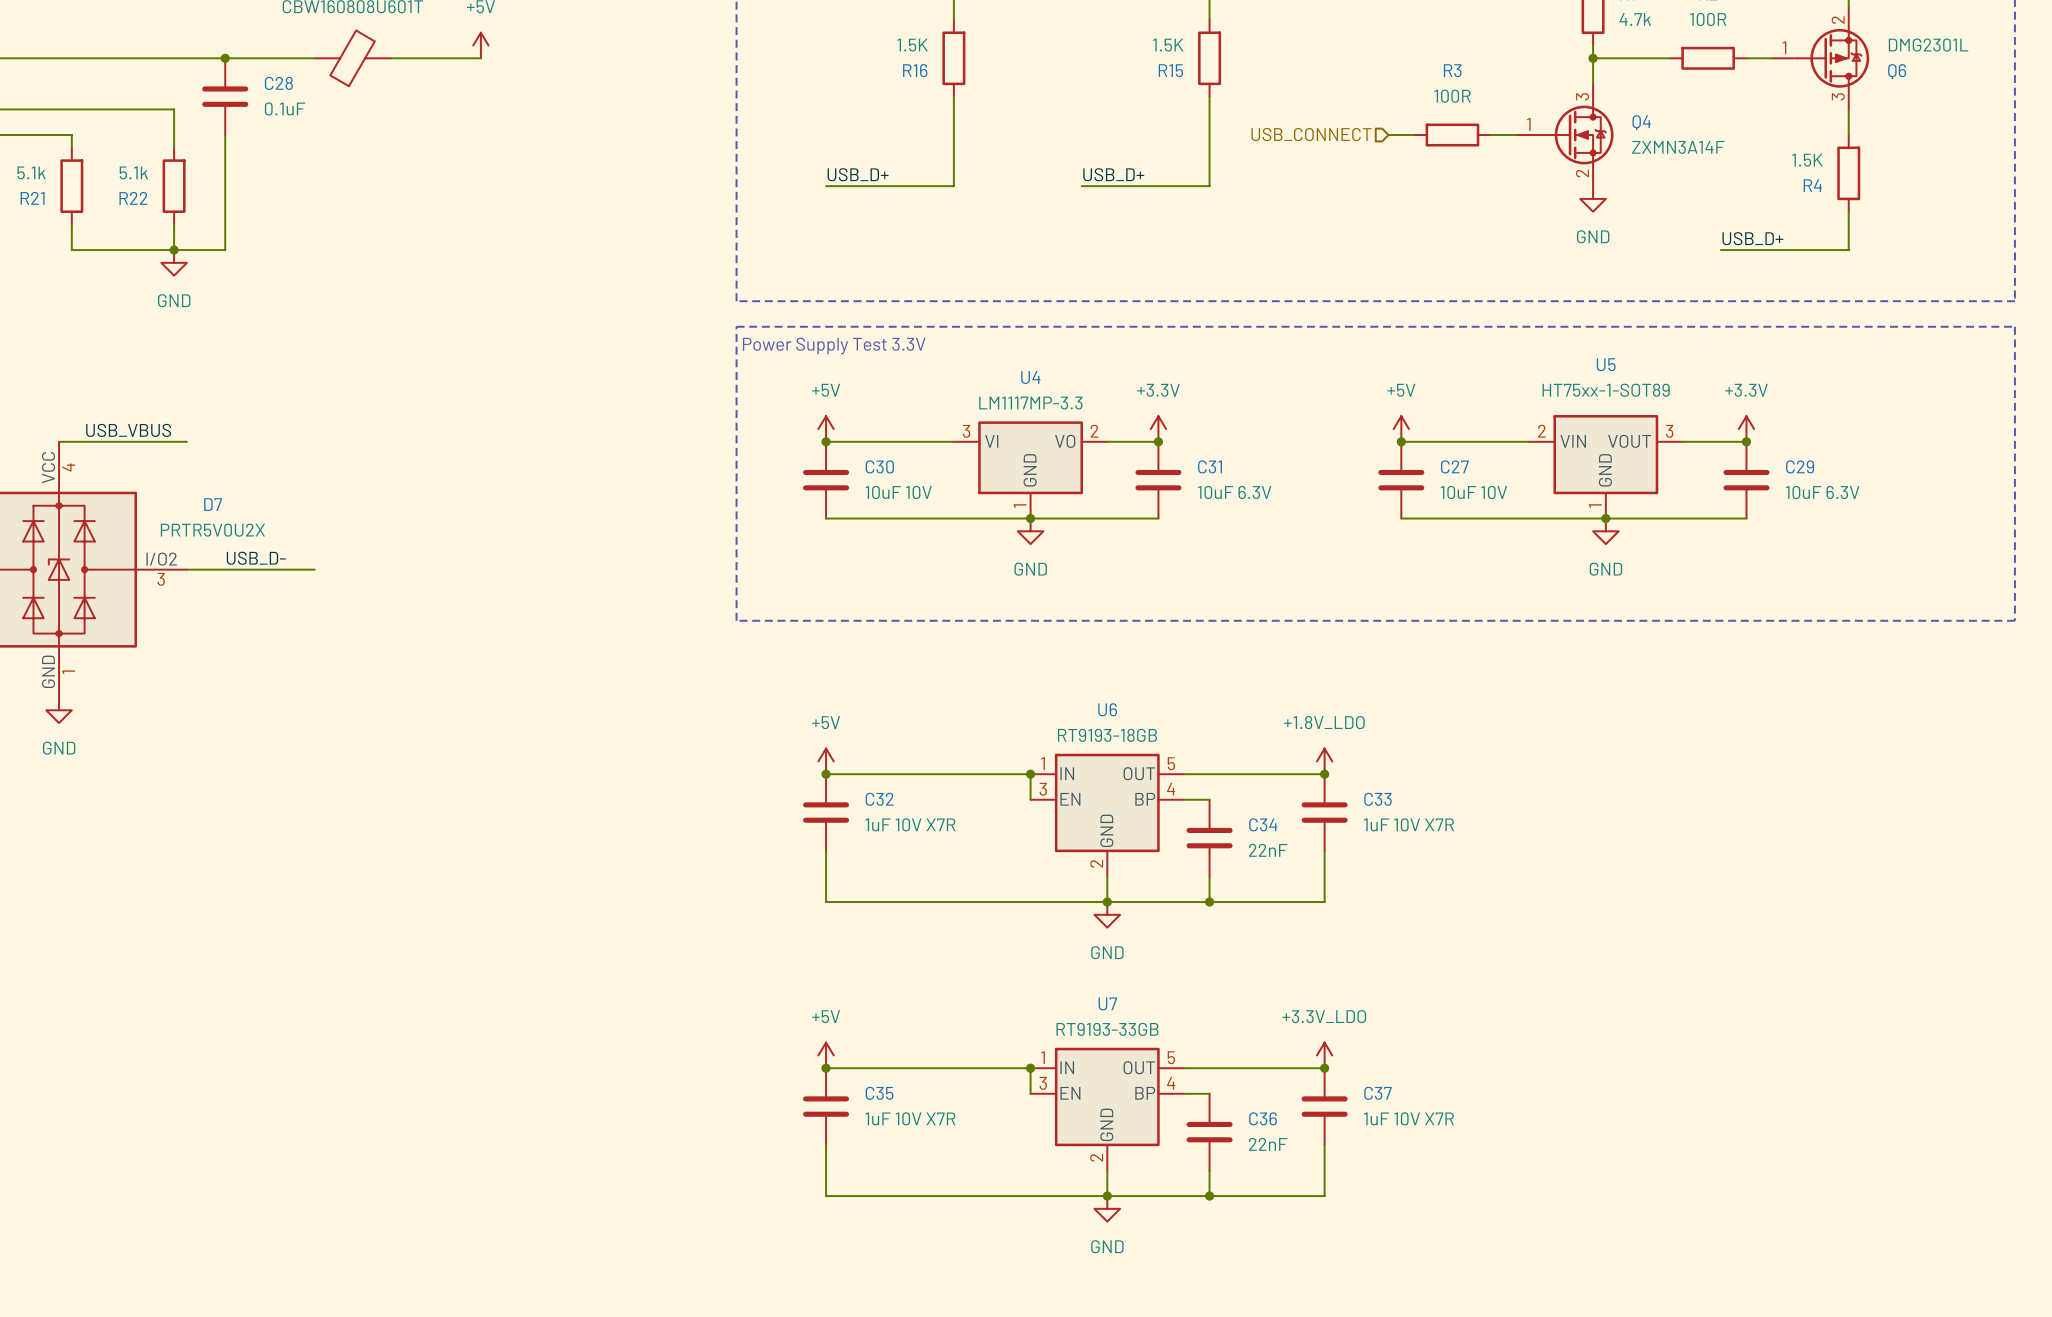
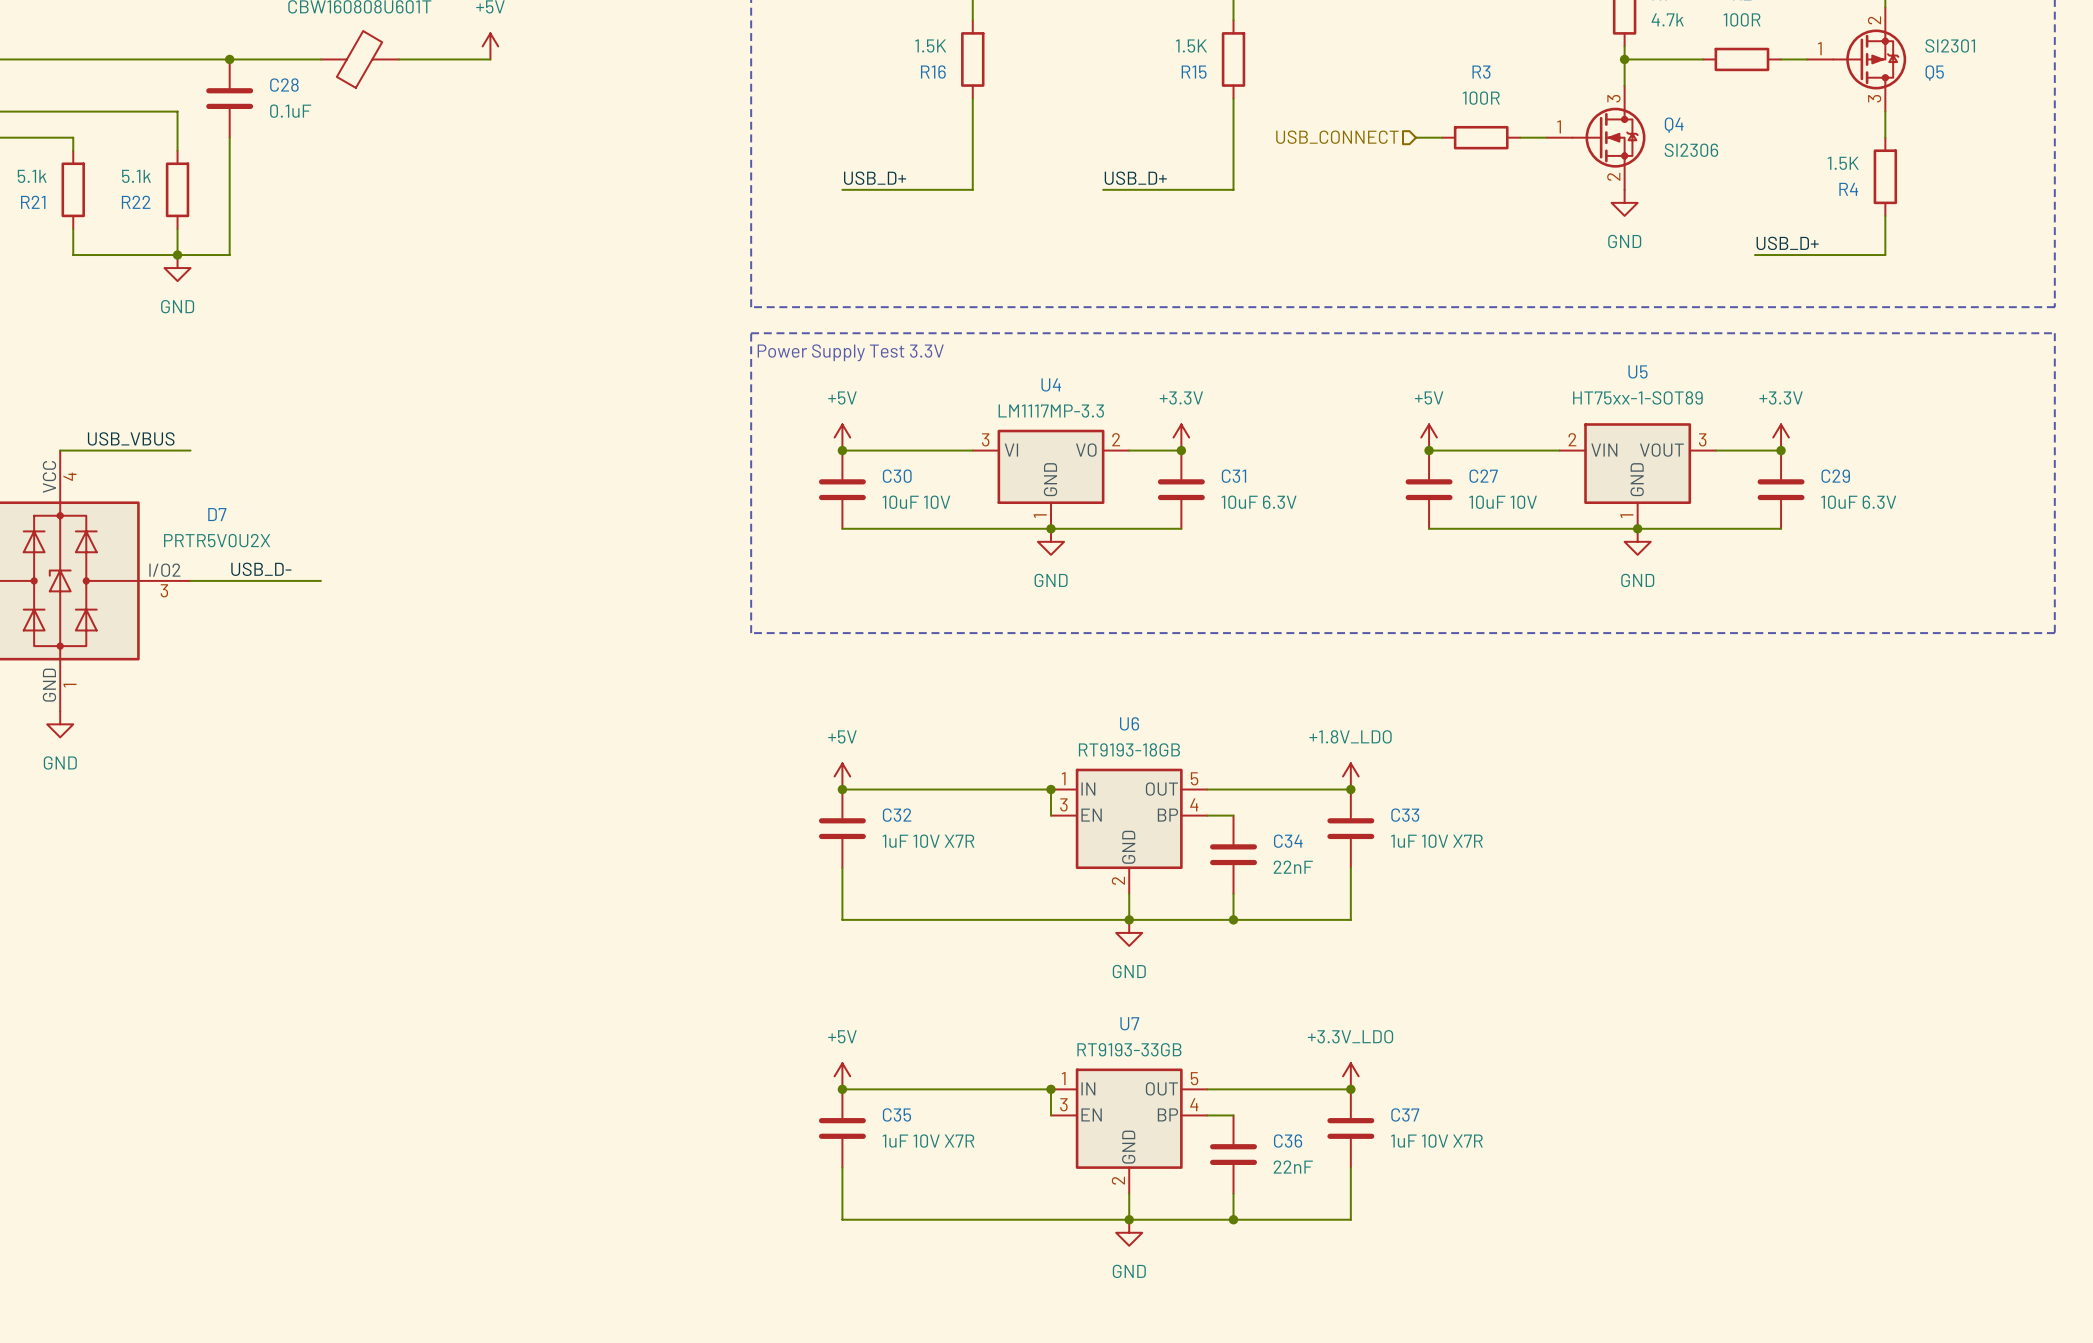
Q6 value: DMG2301L (1928, 45) -> SI2301 (1950, 45)
Q6 name: Q6 (1897, 71) -> Q5 (1934, 73)
Q4 value: ZXMN3A14F (1678, 147) -> SI2306 (1691, 150)

